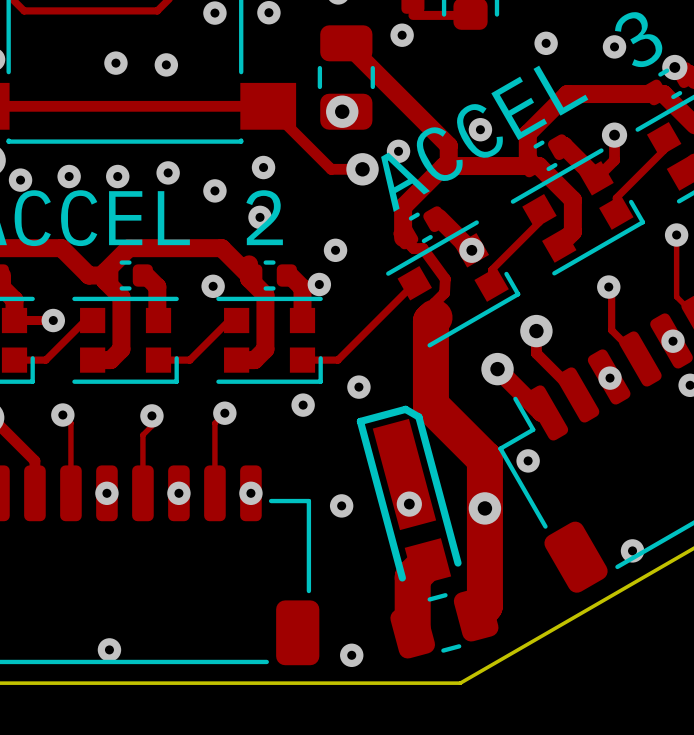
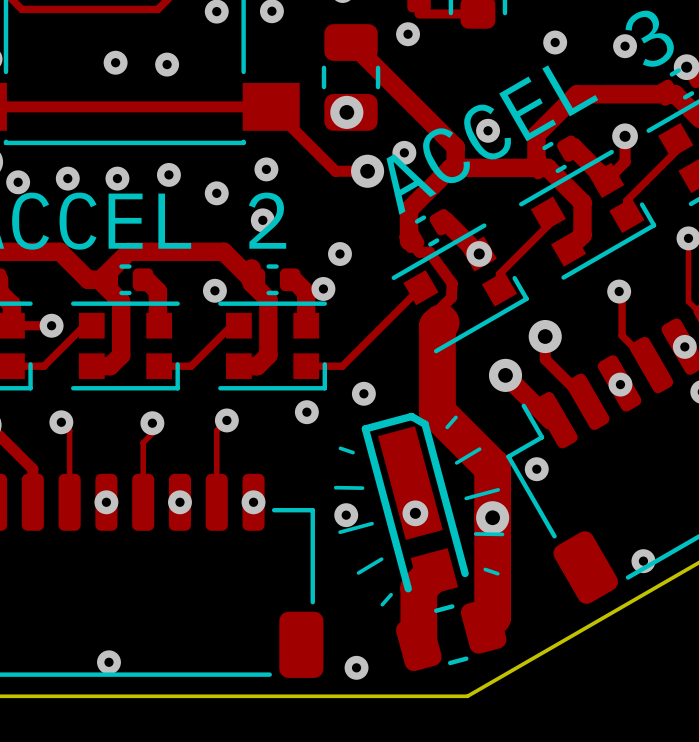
line: none -> (455, 417) (447, 427)
line: none -> (340, 448) (353, 452)
line: none -> (479, 449) (456, 462)
line: none -> (335, 487) (362, 488)
line: none -> (498, 489) (466, 498)
line: none -> (372, 523) (340, 532)
line: none -> (475, 533) (502, 534)
line: none -> (381, 559) (358, 572)
line: none -> (485, 569) (497, 573)
line: none -> (391, 594) (382, 604)

